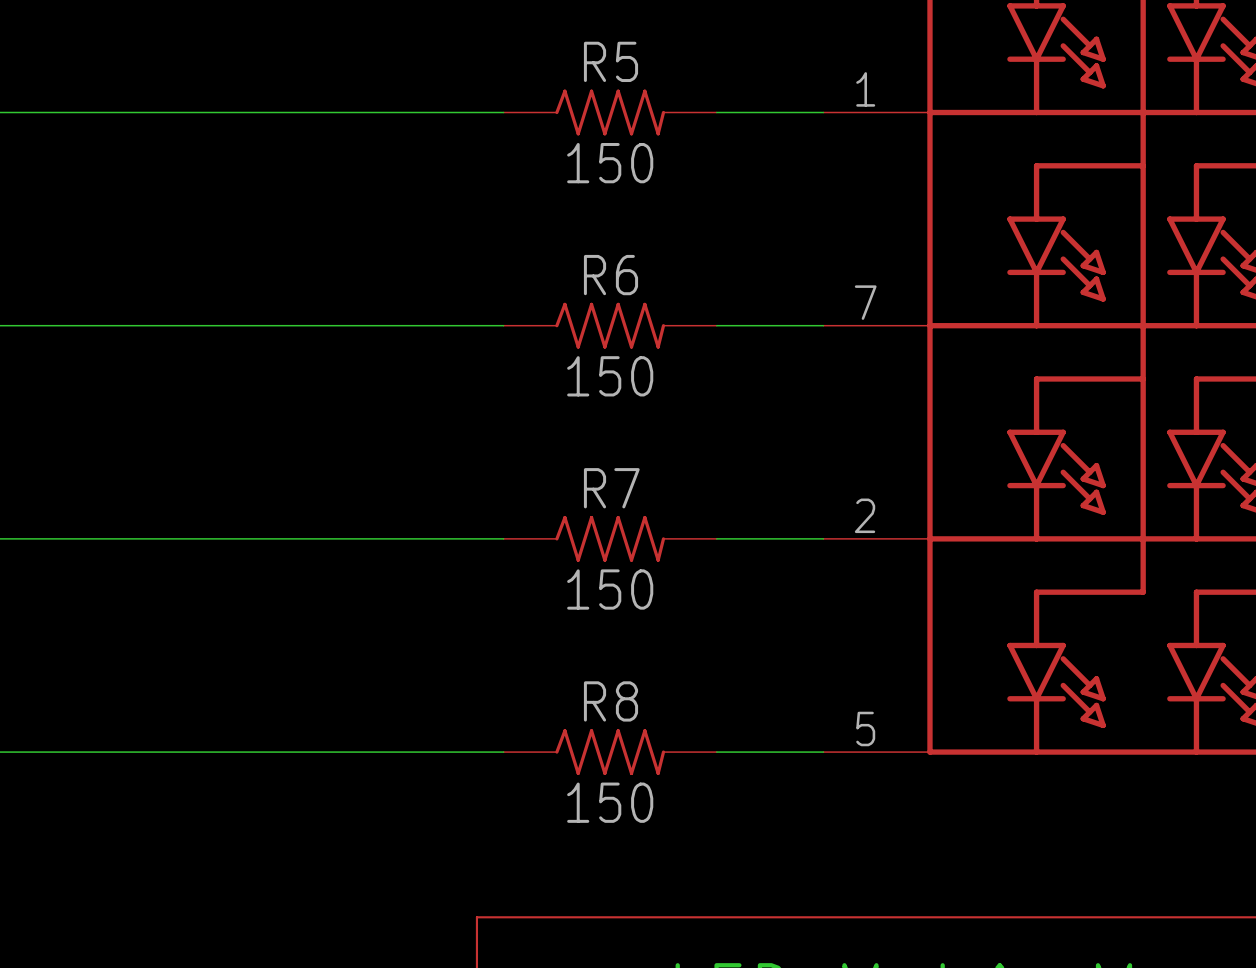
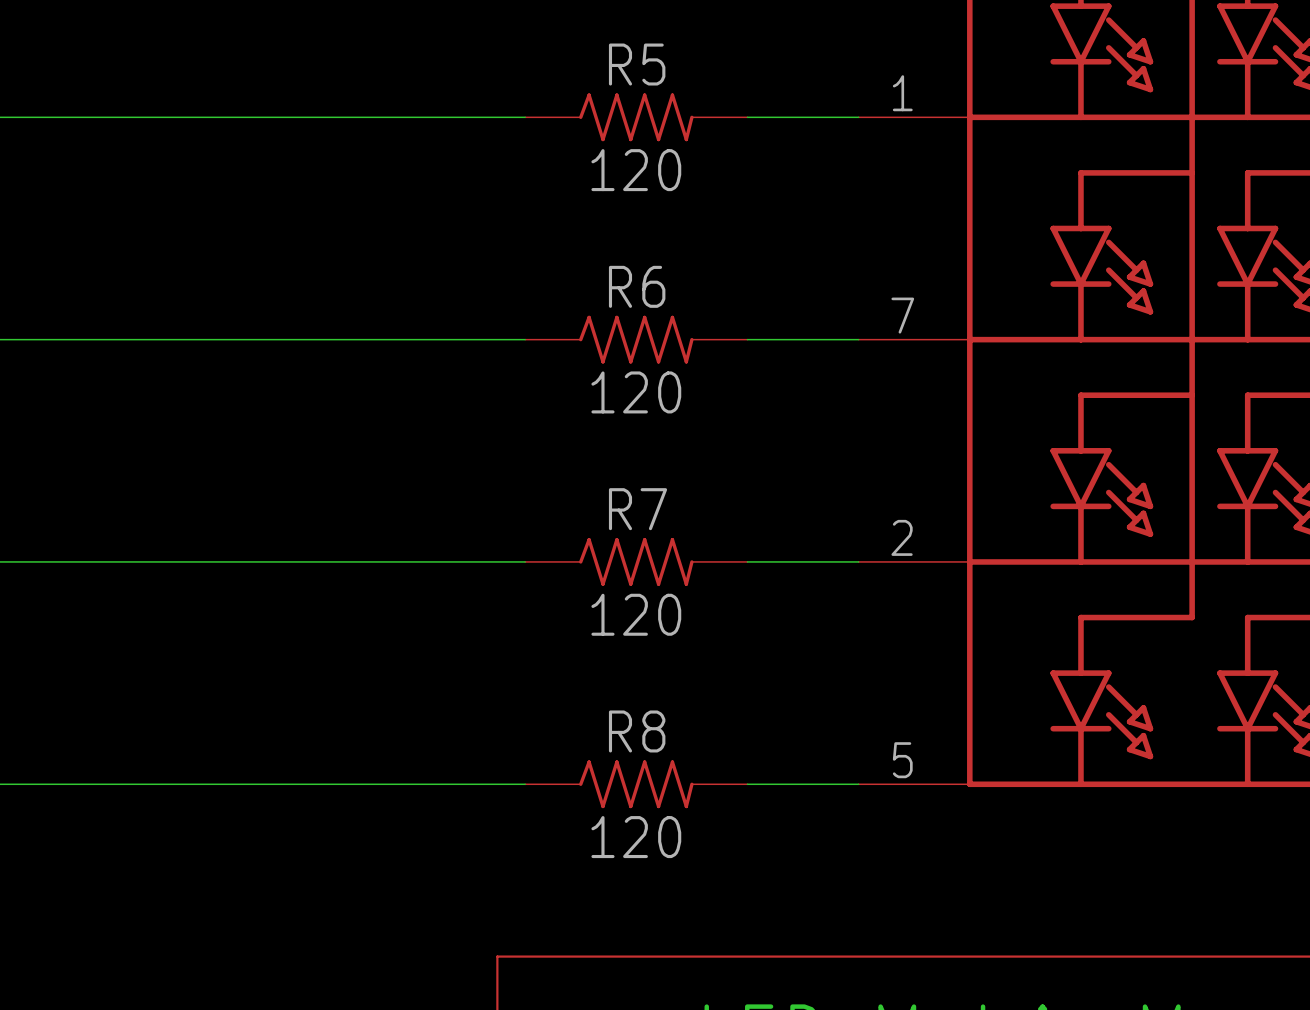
R5 value: 150 (610, 163) -> 120 (636, 170)
R6 value: 150 (610, 376) -> 120 (636, 392)
R7 value: 150 (610, 589) -> 120 (636, 614)
R8 value: 150 (610, 802) -> 120 (636, 837)

